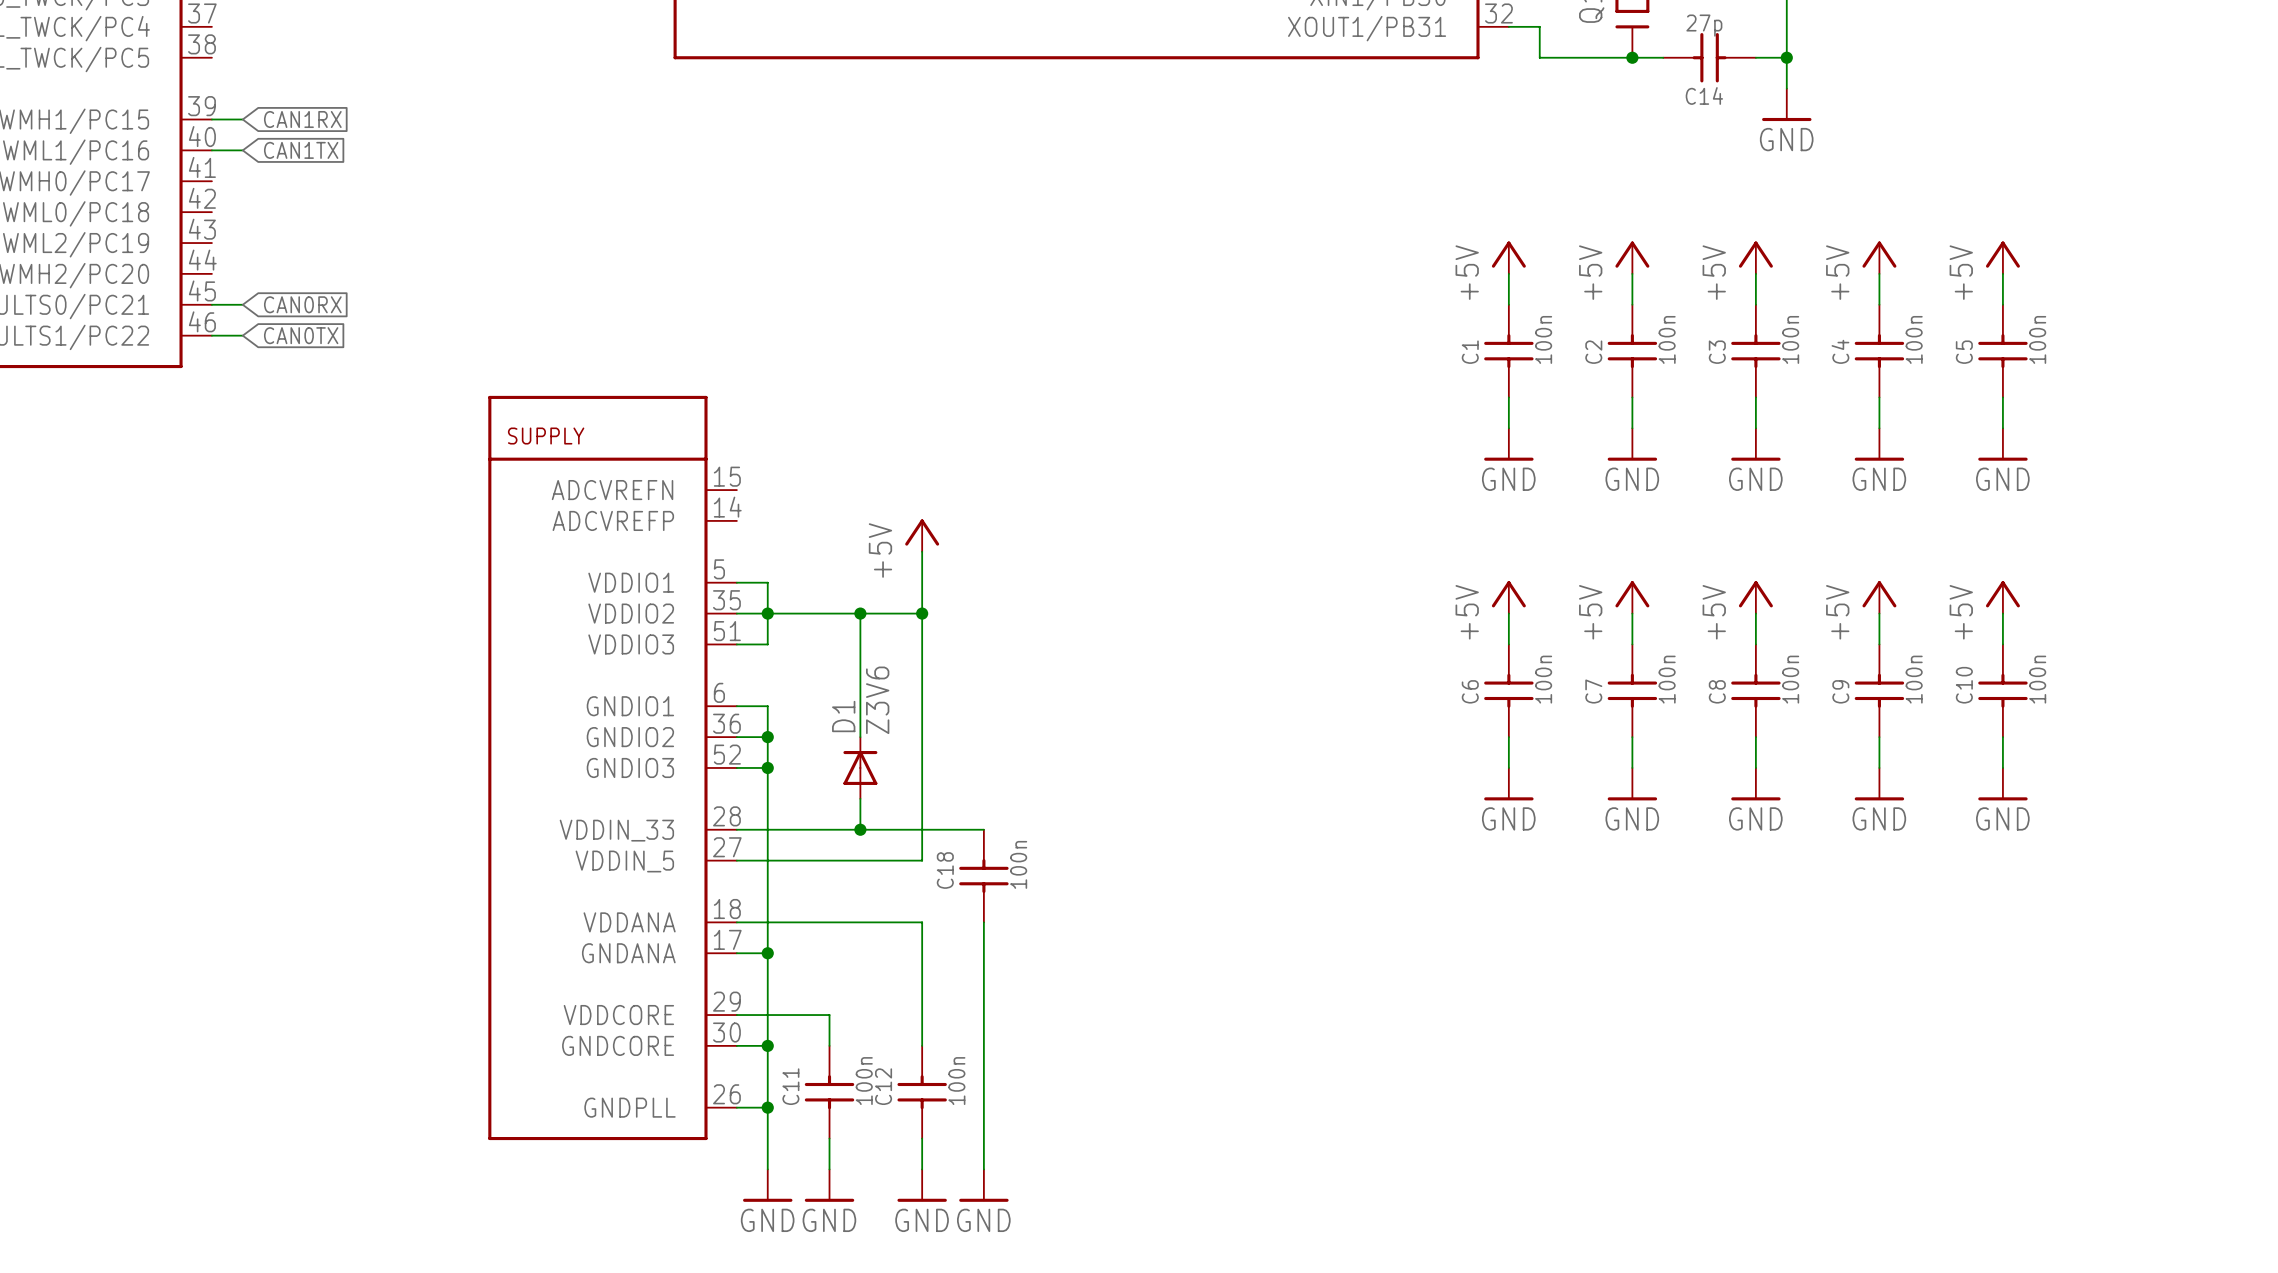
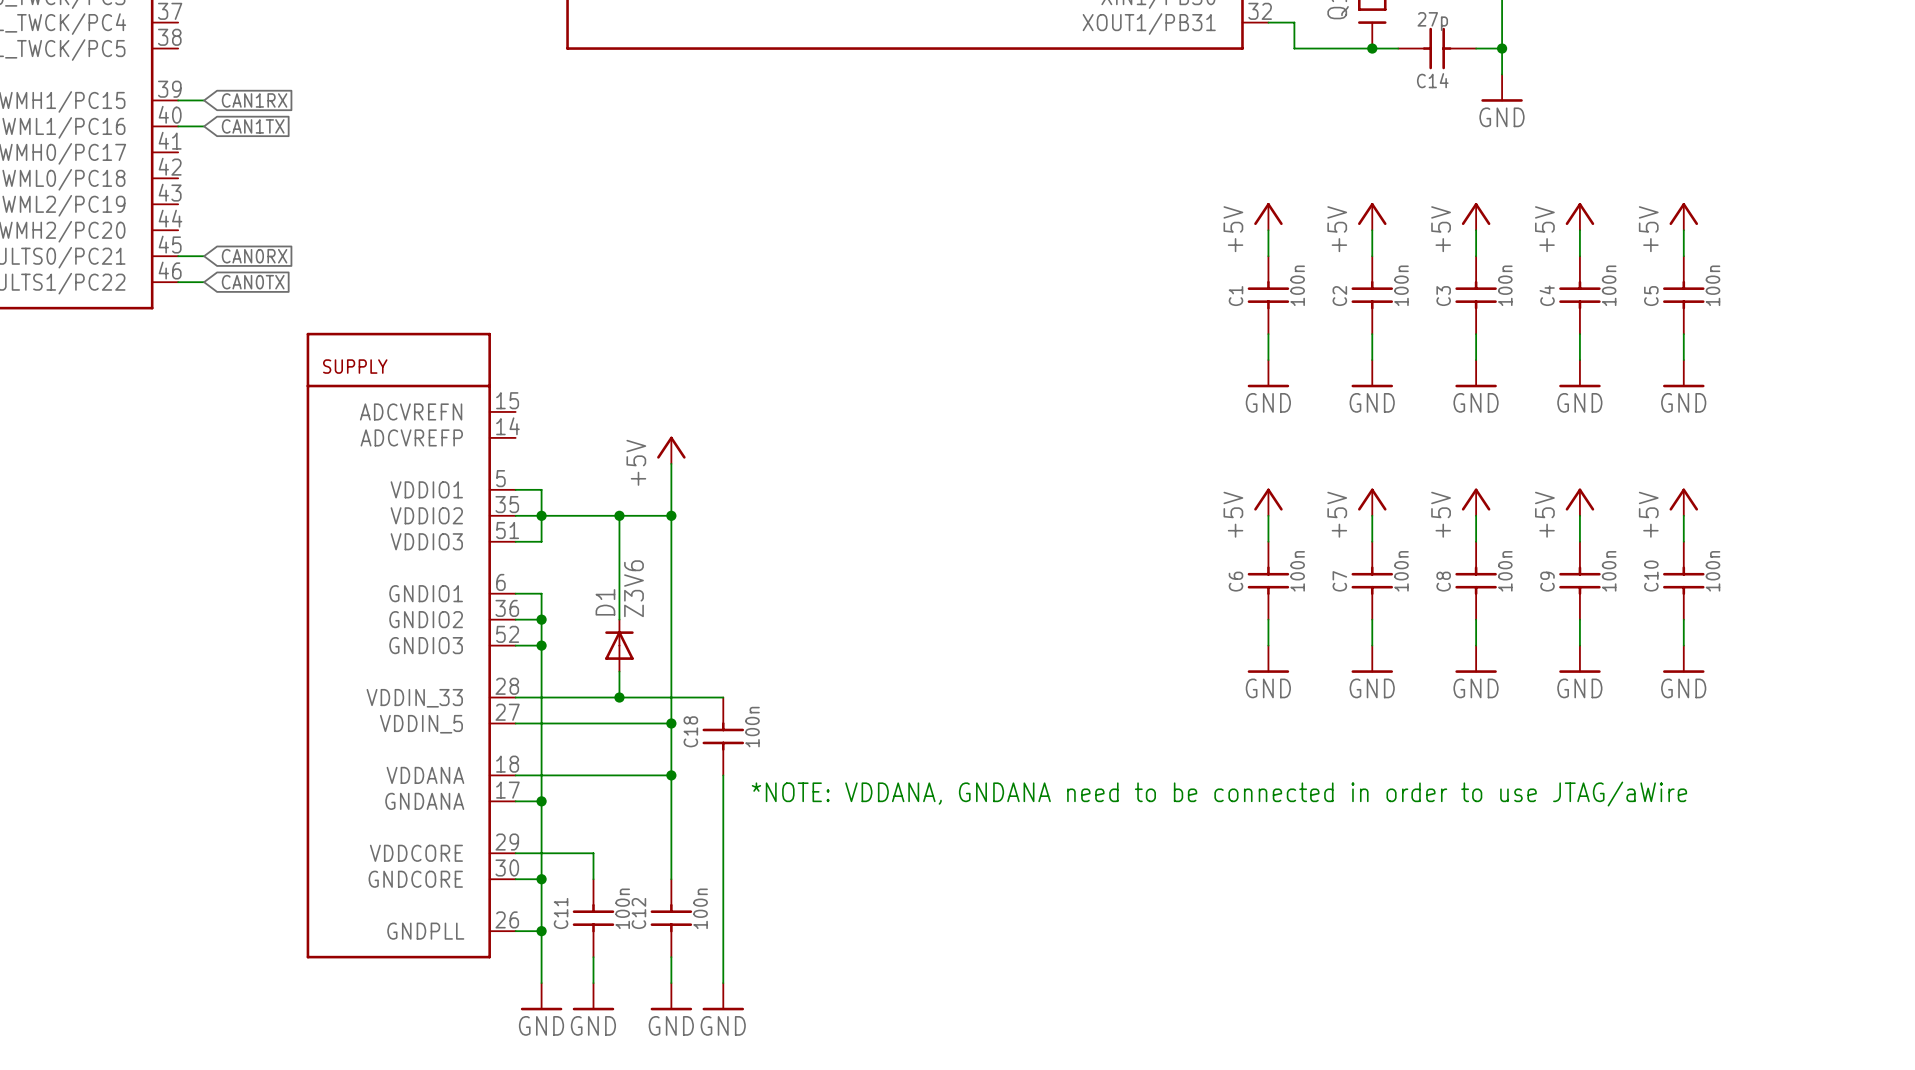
power symbol position: +5V (922, 535) -> +5V (671, 450)
wire: none -> (671, 463) (671, 879)
wire: (922, 551) (922, 860) (798, 860) -> none
wire: (736, 582) (767, 582) (767, 644) (736, 644) -> (515, 489) (541, 489) (541, 541) (515, 541)
junction: none -> (541, 515)
junction: none -> (619, 515)
junction: (767, 613) -> none
wire: (798, 613) (922, 613) -> none
junction: none -> (671, 515)
wire: (860, 613) (860, 737) -> none
junction: (860, 613) -> none
junction: (922, 613) -> none
wire: (736, 706) (767, 706) (767, 1169) -> (515, 593) (541, 593) (541, 983)
wire: none -> (515, 619) (541, 619)
junction: none -> (541, 619)
wire: (736, 737) (767, 737) -> (619, 619) (619, 515) (515, 515)
junction: (767, 737) -> none
part position: (612, 767) -> (411, 645)
junction: none -> (541, 645)
wire: (736, 767) (767, 767) -> (515, 645) (541, 645)
junction: (767, 767) -> none
D1 position: (860, 767) -> (619, 645)
wire: none -> (619, 671) (619, 697) (515, 697)
wire: (860, 798) (860, 829) (983, 829) -> none
junction: none -> (619, 697)
junction: (860, 829) -> none
wire: none -> (515, 723) (619, 723)
junction: none -> (671, 723)
C18 position: (983, 876) -> (723, 736)
wire: none -> (515, 775) (619, 775)
wire: (798, 922) (922, 922) (922, 1045) -> none
wire: (983, 922) (983, 1169) -> (723, 775) (723, 983)
text: none -> *NOTE: VDDANA, GNDANA need to be connected in order to use JTAG/aWire (1219, 794)
junction: none -> (541, 801)
wire: (736, 953) (767, 953) -> (515, 801) (541, 801)
junction position: (767, 953) -> (671, 775)
wire: (736, 1015) (829, 1015) (829, 1045) -> (515, 853) (593, 853) (593, 879)
junction: none -> (541, 879)
wire: (736, 1045) (767, 1045) -> (515, 879) (541, 879)
junction: (767, 1045) -> none
C11 position: (829, 1092) -> (593, 918)
C12 position: (922, 1092) -> (671, 918)
junction: none -> (541, 931)
wire: (736, 1107) (767, 1107) -> (515, 931) (541, 931)
junction: (767, 1107) -> none
wire: (829, 1138) (829, 1169) -> (593, 957) (593, 983)
wire: (922, 1138) (922, 1169) -> (671, 957) (671, 983)
power symbol: none -> GND (541, 996)
power symbol: none -> GND (593, 996)
power symbol: GND (767, 1185) -> none
power symbol: none -> GND (671, 996)
power symbol: GND (829, 1185) -> none
power symbol: none -> GND (723, 996)
power symbol: GND (922, 1185) -> none
power symbol: GND (983, 1185) -> none

